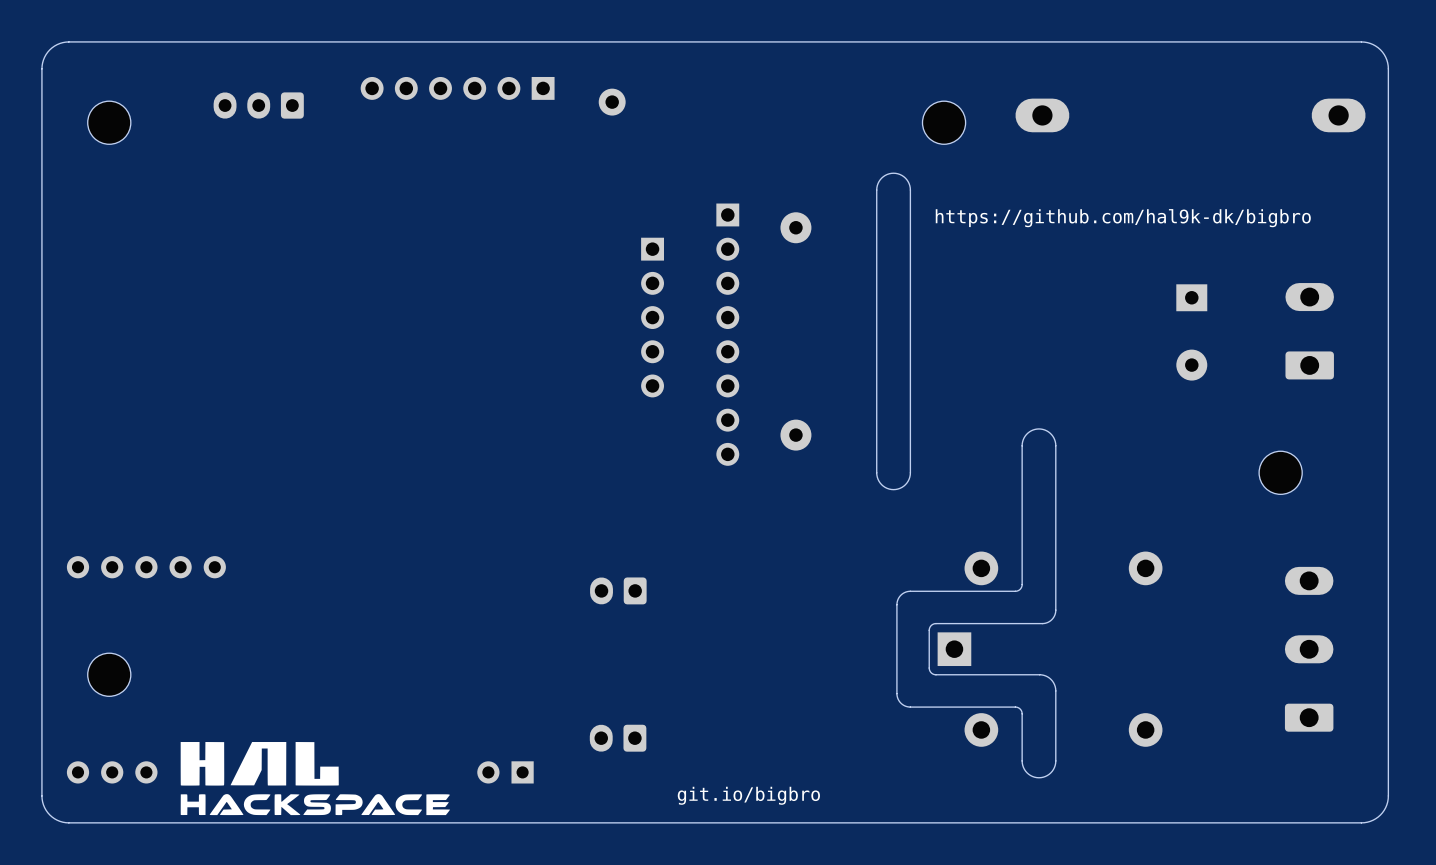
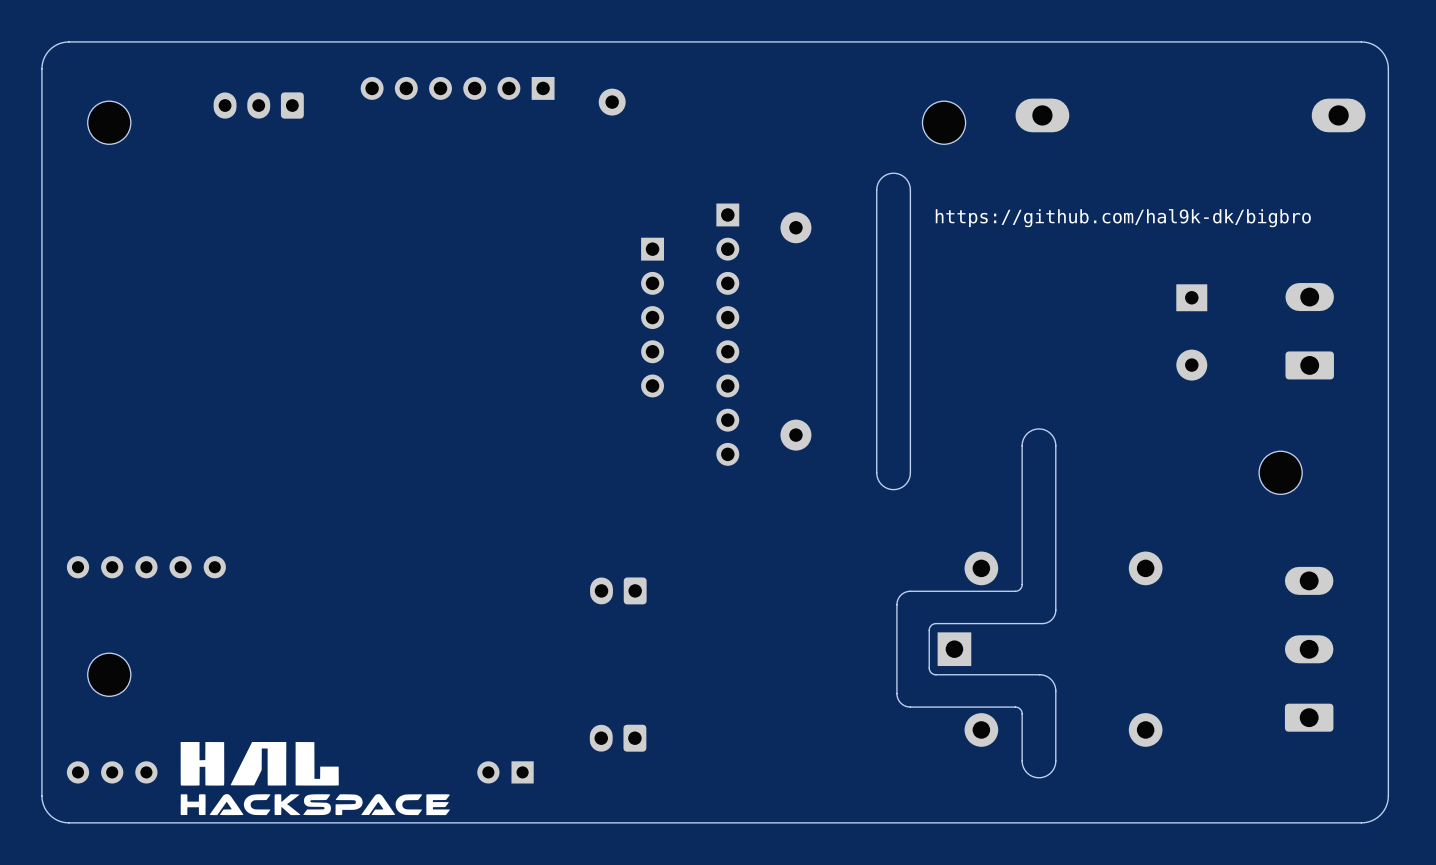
text: git.io/bigbro (748, 795) -> none

